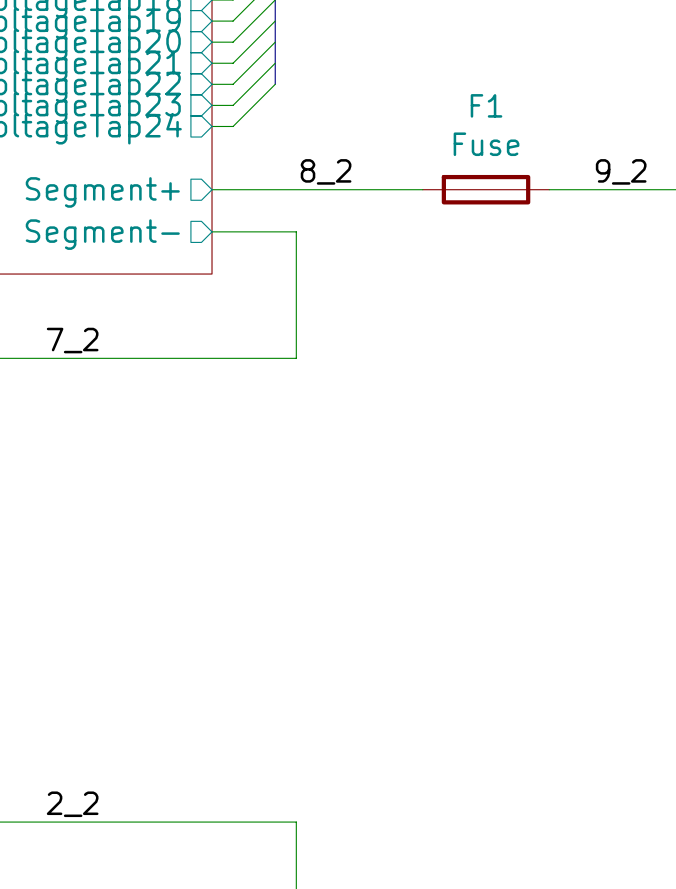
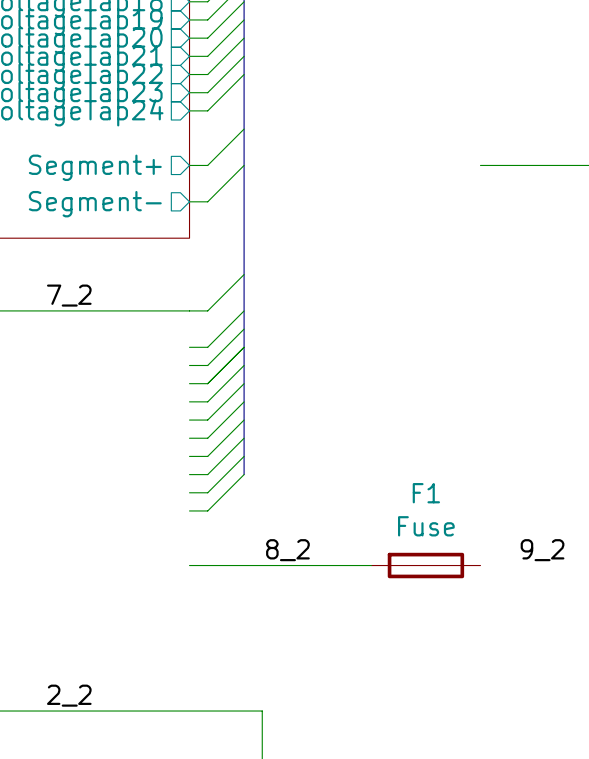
bus: none -> (244, 74) (244, 474)
label: 8_2 (326, 171) -> none
label: 9_2 (621, 171) -> none
wire: (233, 189) (422, 189) -> (207, 165) (244, 129)
wire: none -> (244, 165) (207, 201)
F1 position: (486, 189) -> (425, 565)
wire: (233, 231) (296, 231) (296, 358) (233, 358) -> (244, 274) (207, 310)
wire: none -> (244, 310) (207, 347) (189, 347)
wire: none -> (244, 329) (207, 365) (189, 365)
wire: none -> (244, 347) (207, 383) (189, 383)
wire: none -> (244, 365) (207, 401) (189, 401)
wire: none -> (244, 383) (207, 420) (189, 420)
wire: none -> (244, 401) (207, 438) (189, 438)
wire: none -> (244, 420) (207, 456) (189, 456)
wire: none -> (244, 438) (207, 474) (189, 474)
wire: none -> (244, 456) (207, 492) (189, 492)
wire: none -> (244, 474) (207, 510) (189, 510)
label: none -> 8_2 (287, 550)
label: none -> 9_2 (542, 550)
wire: none -> (189, 565) (371, 565)

